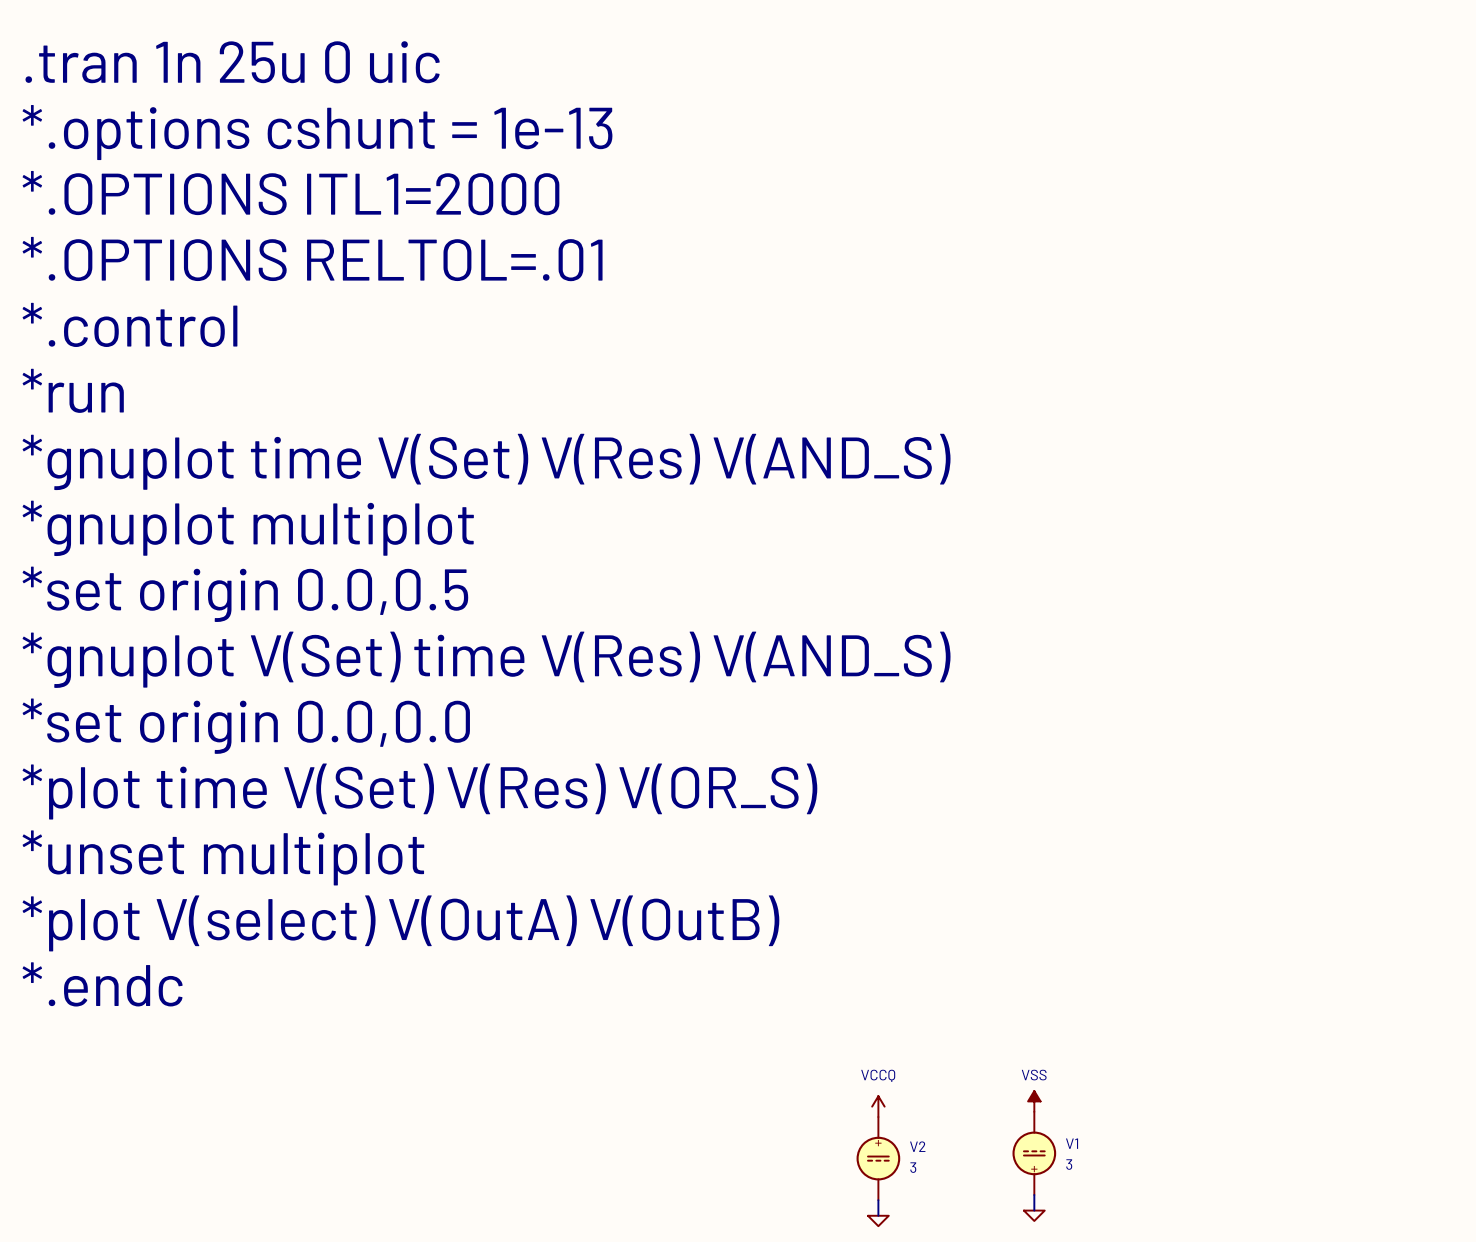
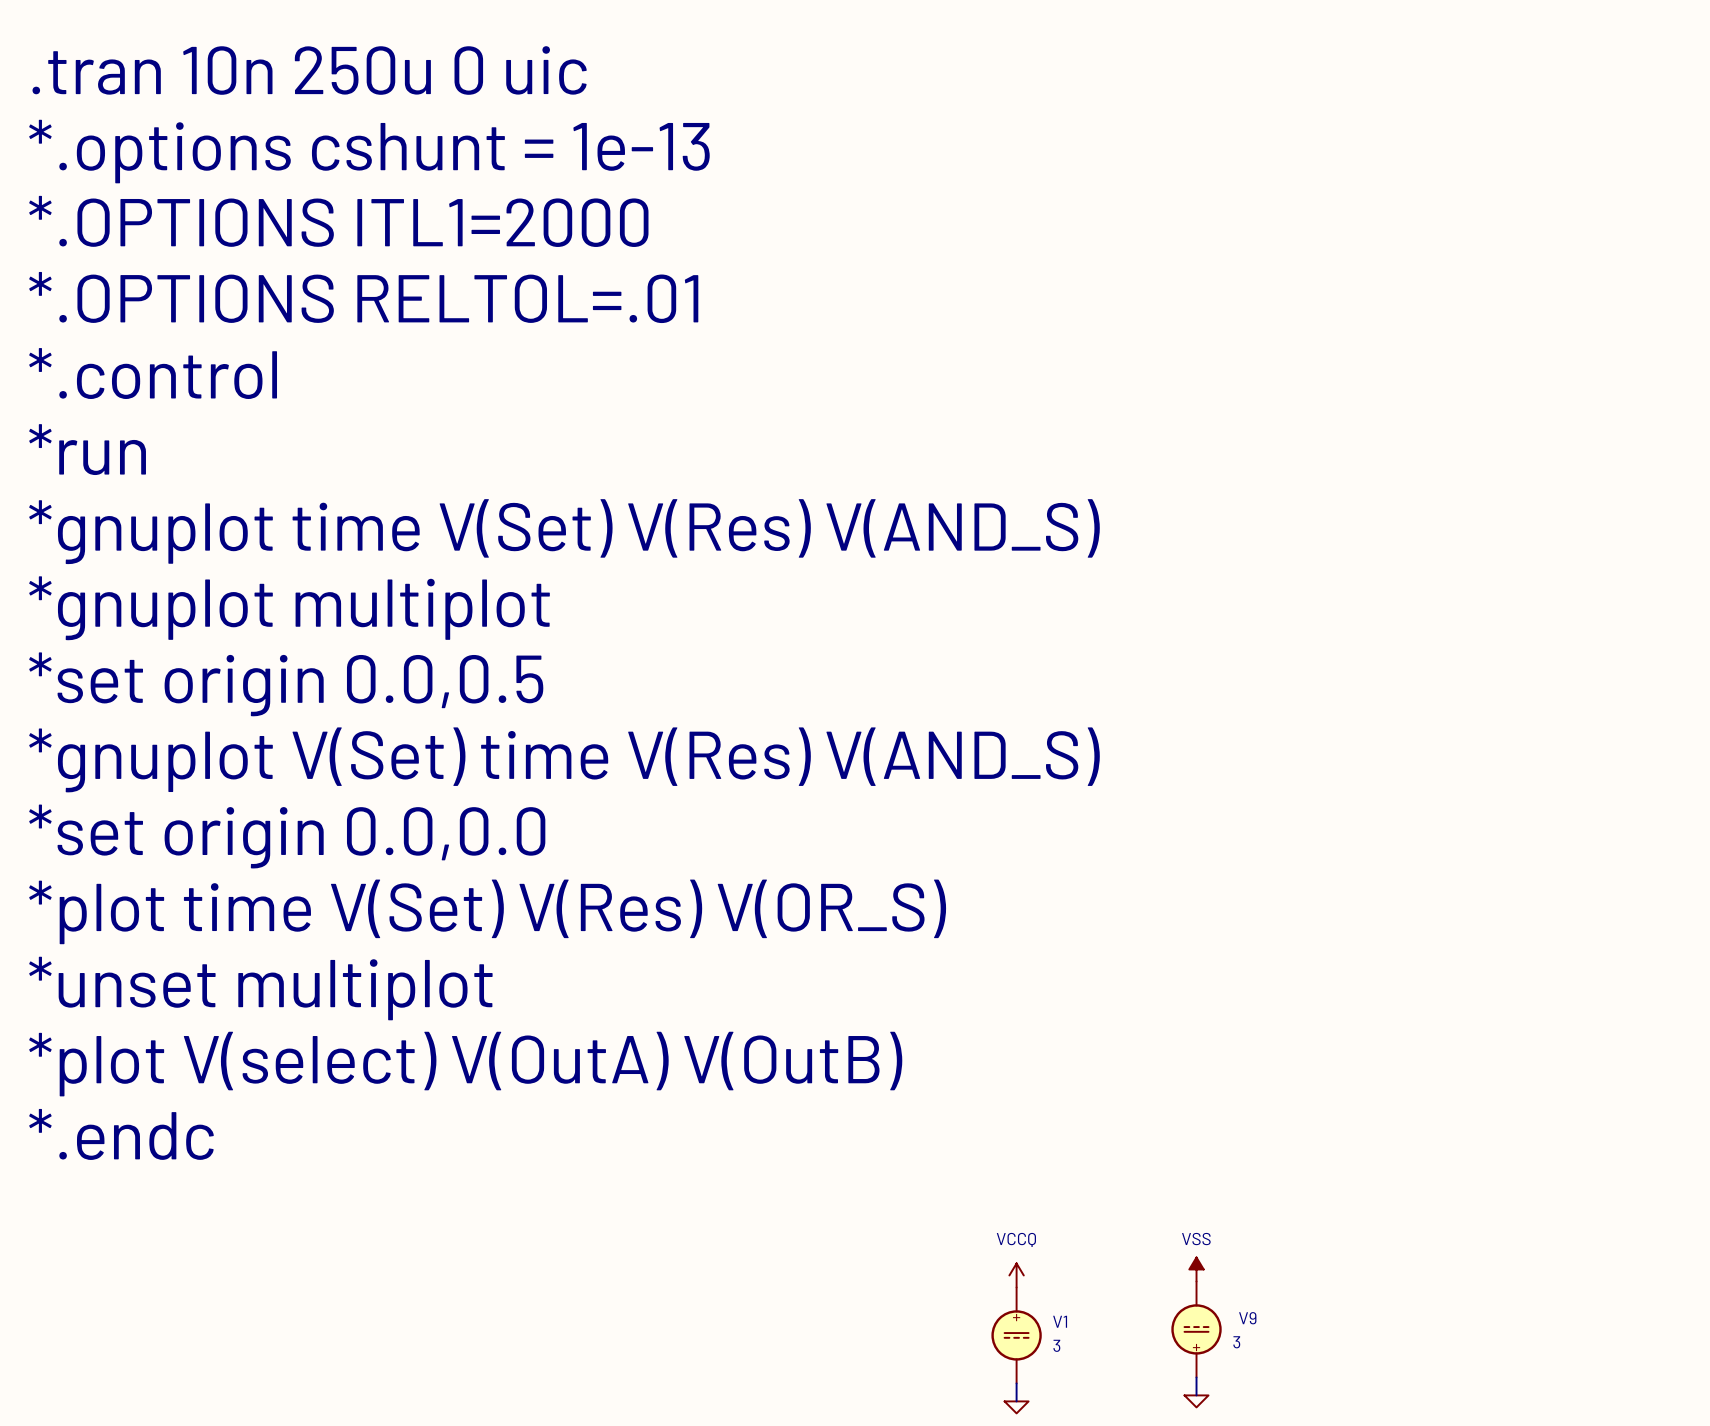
text: .tran 1n 25u 0 uic (232, 62) -> .tran 10n 250u 0 uic (309, 70)
V1 name: V1 (1072, 1143) -> V9 (1247, 1318)
V2 name: V2 (917, 1146) -> V1 (1060, 1321)

